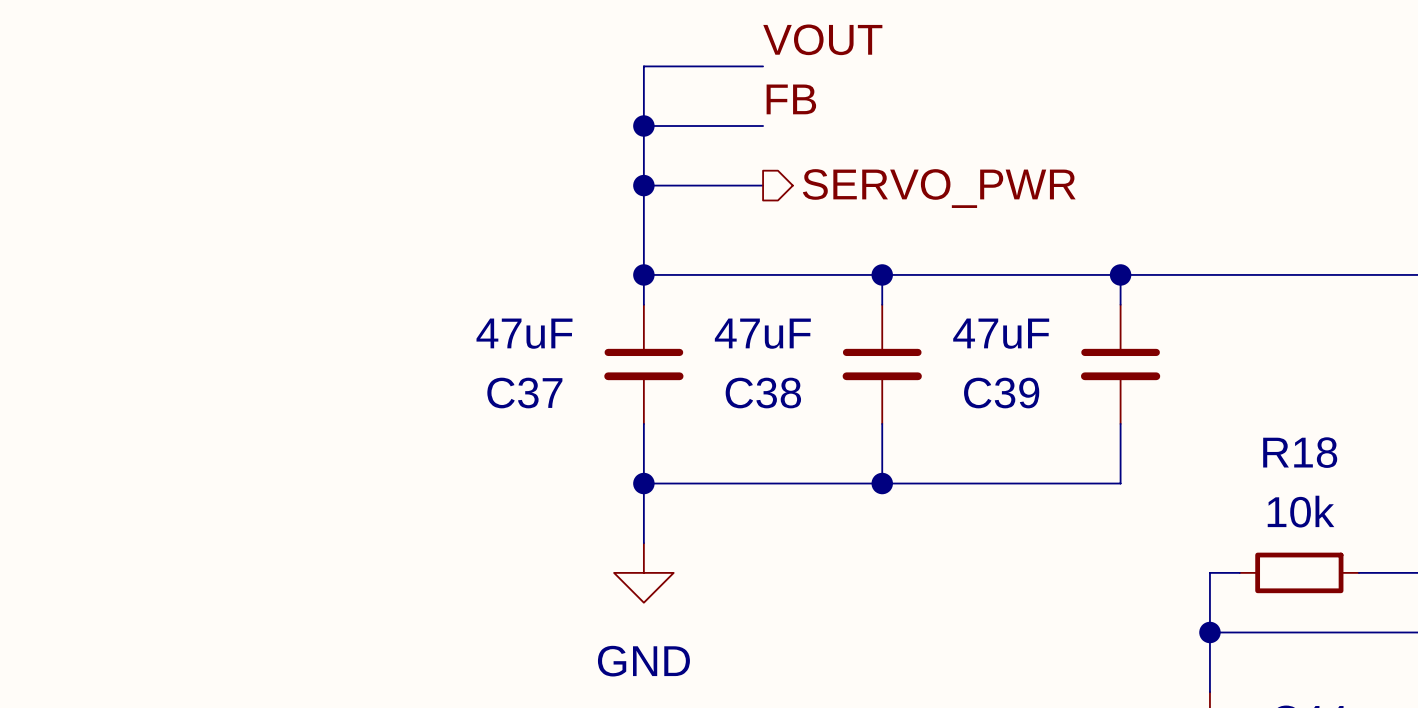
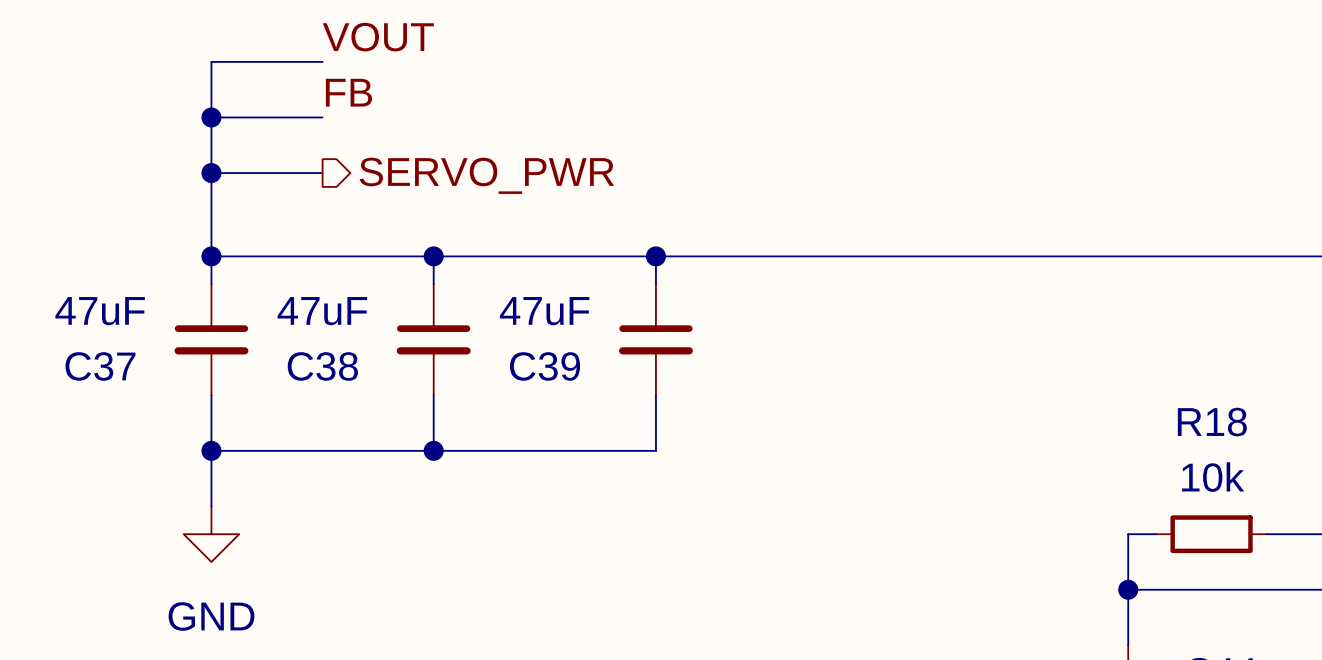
label position: VOUT (822, 39) -> VOUT (378, 37)
wire: (763, 66) (643, 66) (643, 304) -> (322, 61) (211, 61) (211, 284)
label position: FB (791, 99) -> FB (348, 92)
junction: none -> (211, 117)
wire: (643, 126) (763, 126) -> (211, 117) (322, 117)
junction: (643, 126) -> none
junction: none -> (211, 173)
wire: (643, 185) (763, 185) -> (211, 173) (322, 173)
junction: (643, 185) -> none
hierarchical label position: SERVO_PWR (939, 188) -> SERVO_PWR (486, 175)
wire: none -> (211, 256) (600, 256)
junction: none -> (211, 256)
junction: none -> (433, 256)
junction: (643, 274) -> none
junction: none -> (655, 256)
wire: (882, 274) (882, 304) -> (433, 256) (433, 284)
junction: (882, 274) -> none
wire: (1120, 274) (1120, 304) -> (655, 256) (655, 284)
junction: (1120, 274) -> none
C37 position: (643, 364) -> (211, 339)
C38 position: (882, 364) -> (433, 339)
C39 position: (1120, 364) -> (655, 339)
wire: (643, 423) (643, 543) -> (211, 395) (211, 506)
wire: (882, 423) (882, 483) -> (433, 395) (433, 450)
wire: (1120, 423) (1120, 483) (703, 483) -> (655, 395) (655, 450)
wire: none -> (211, 450) (600, 450)
junction: none -> (211, 450)
junction: none -> (433, 450)
junction: (643, 483) -> none
junction: (882, 483) -> none
power symbol position: GND (643, 572) -> GND (211, 534)

